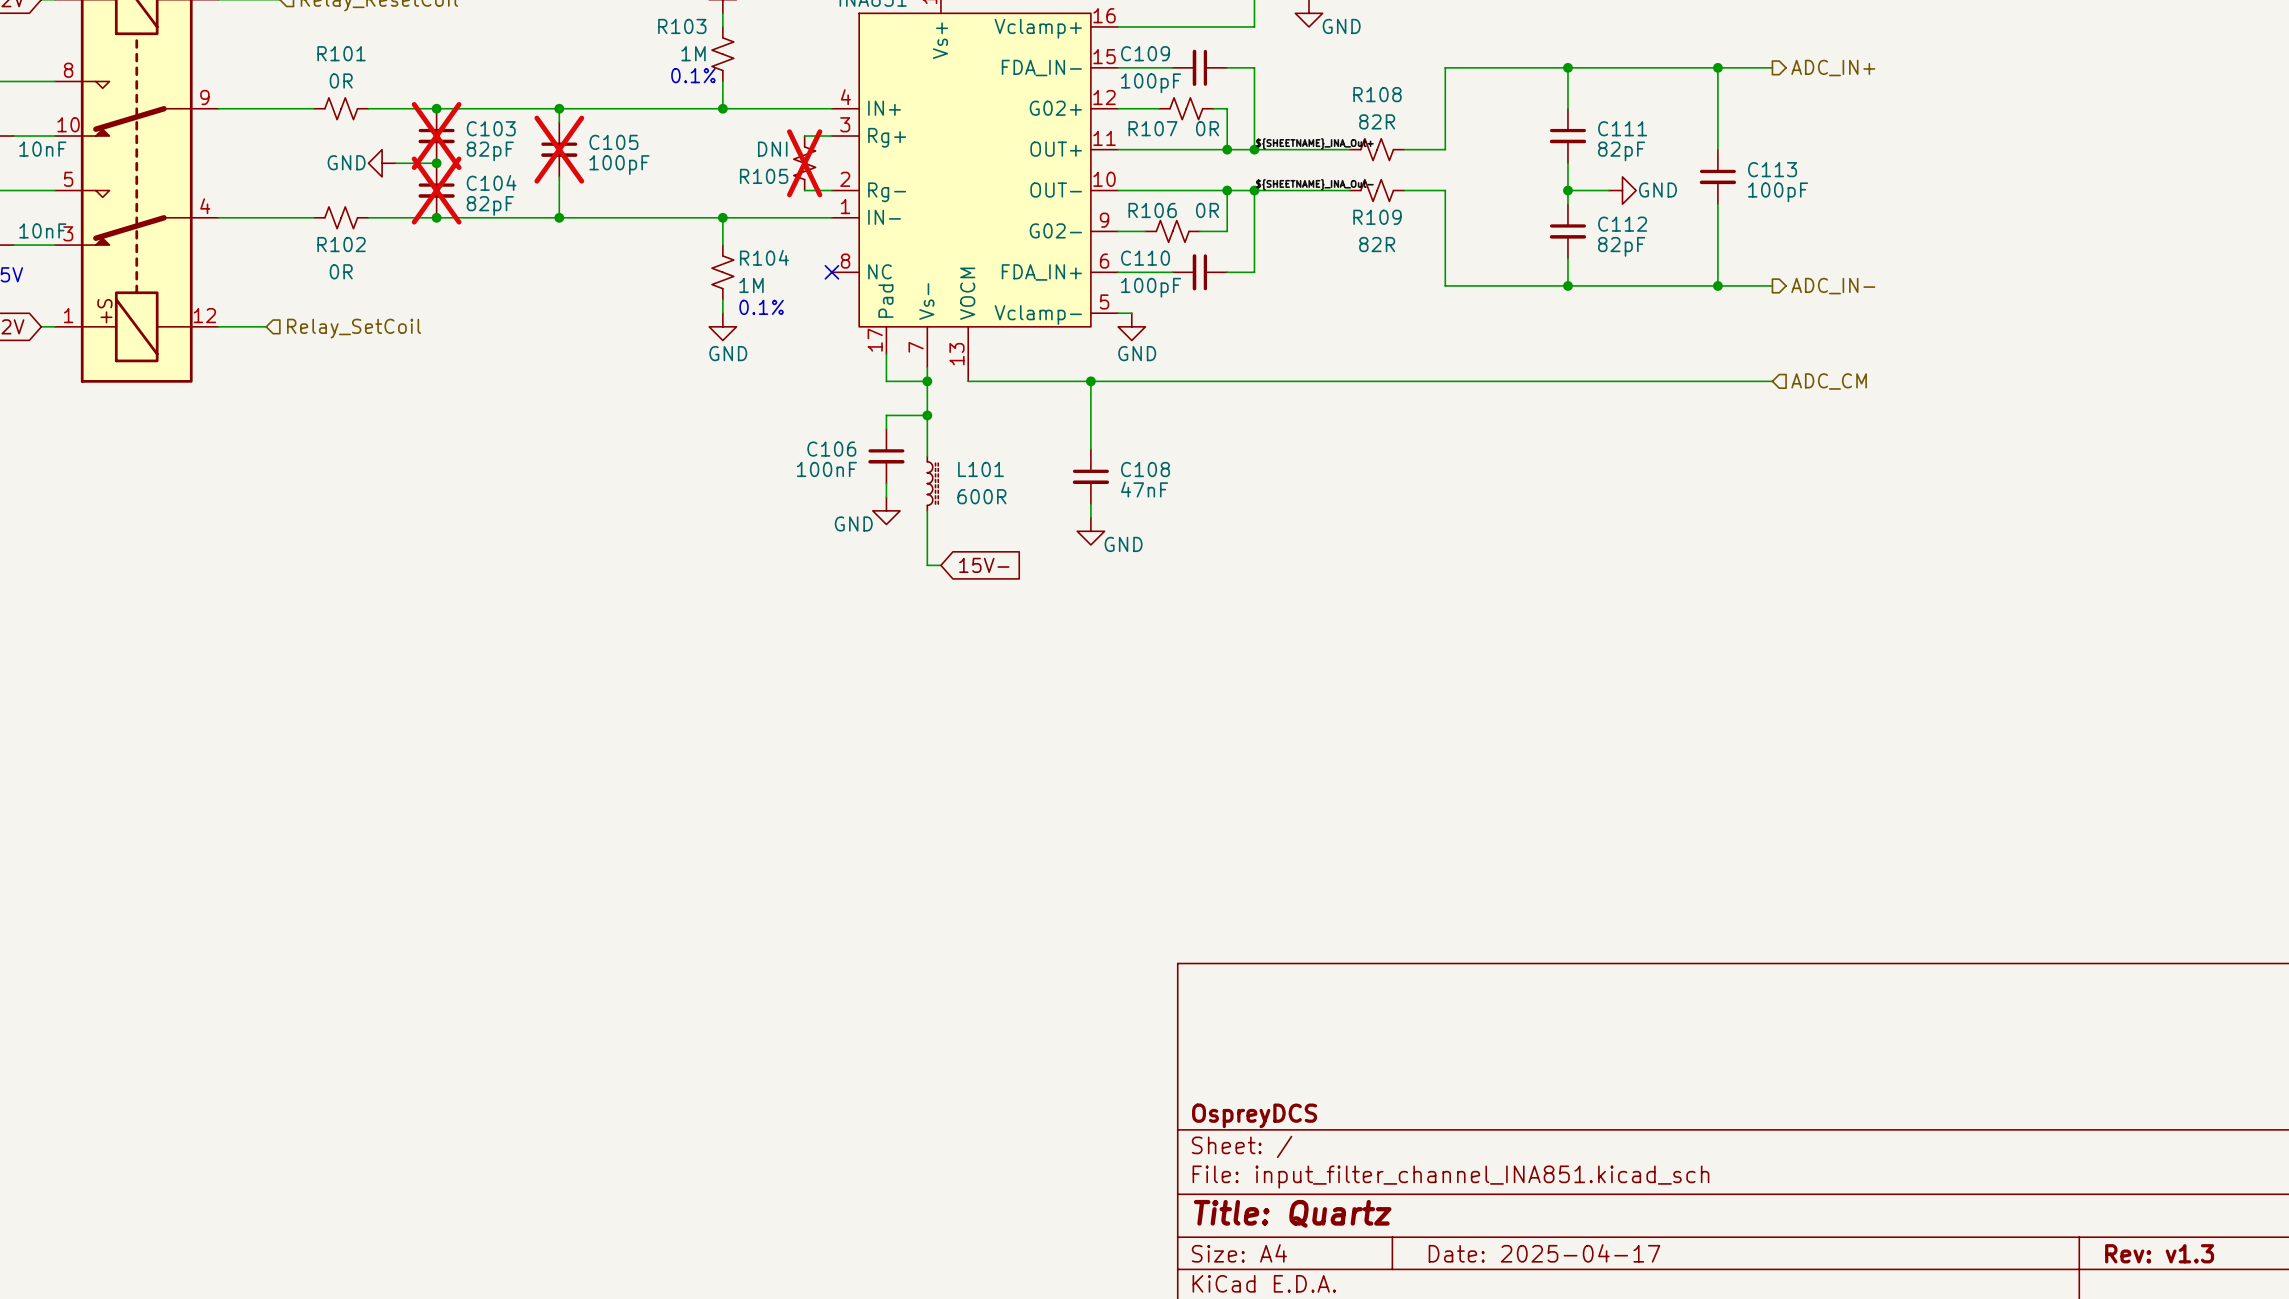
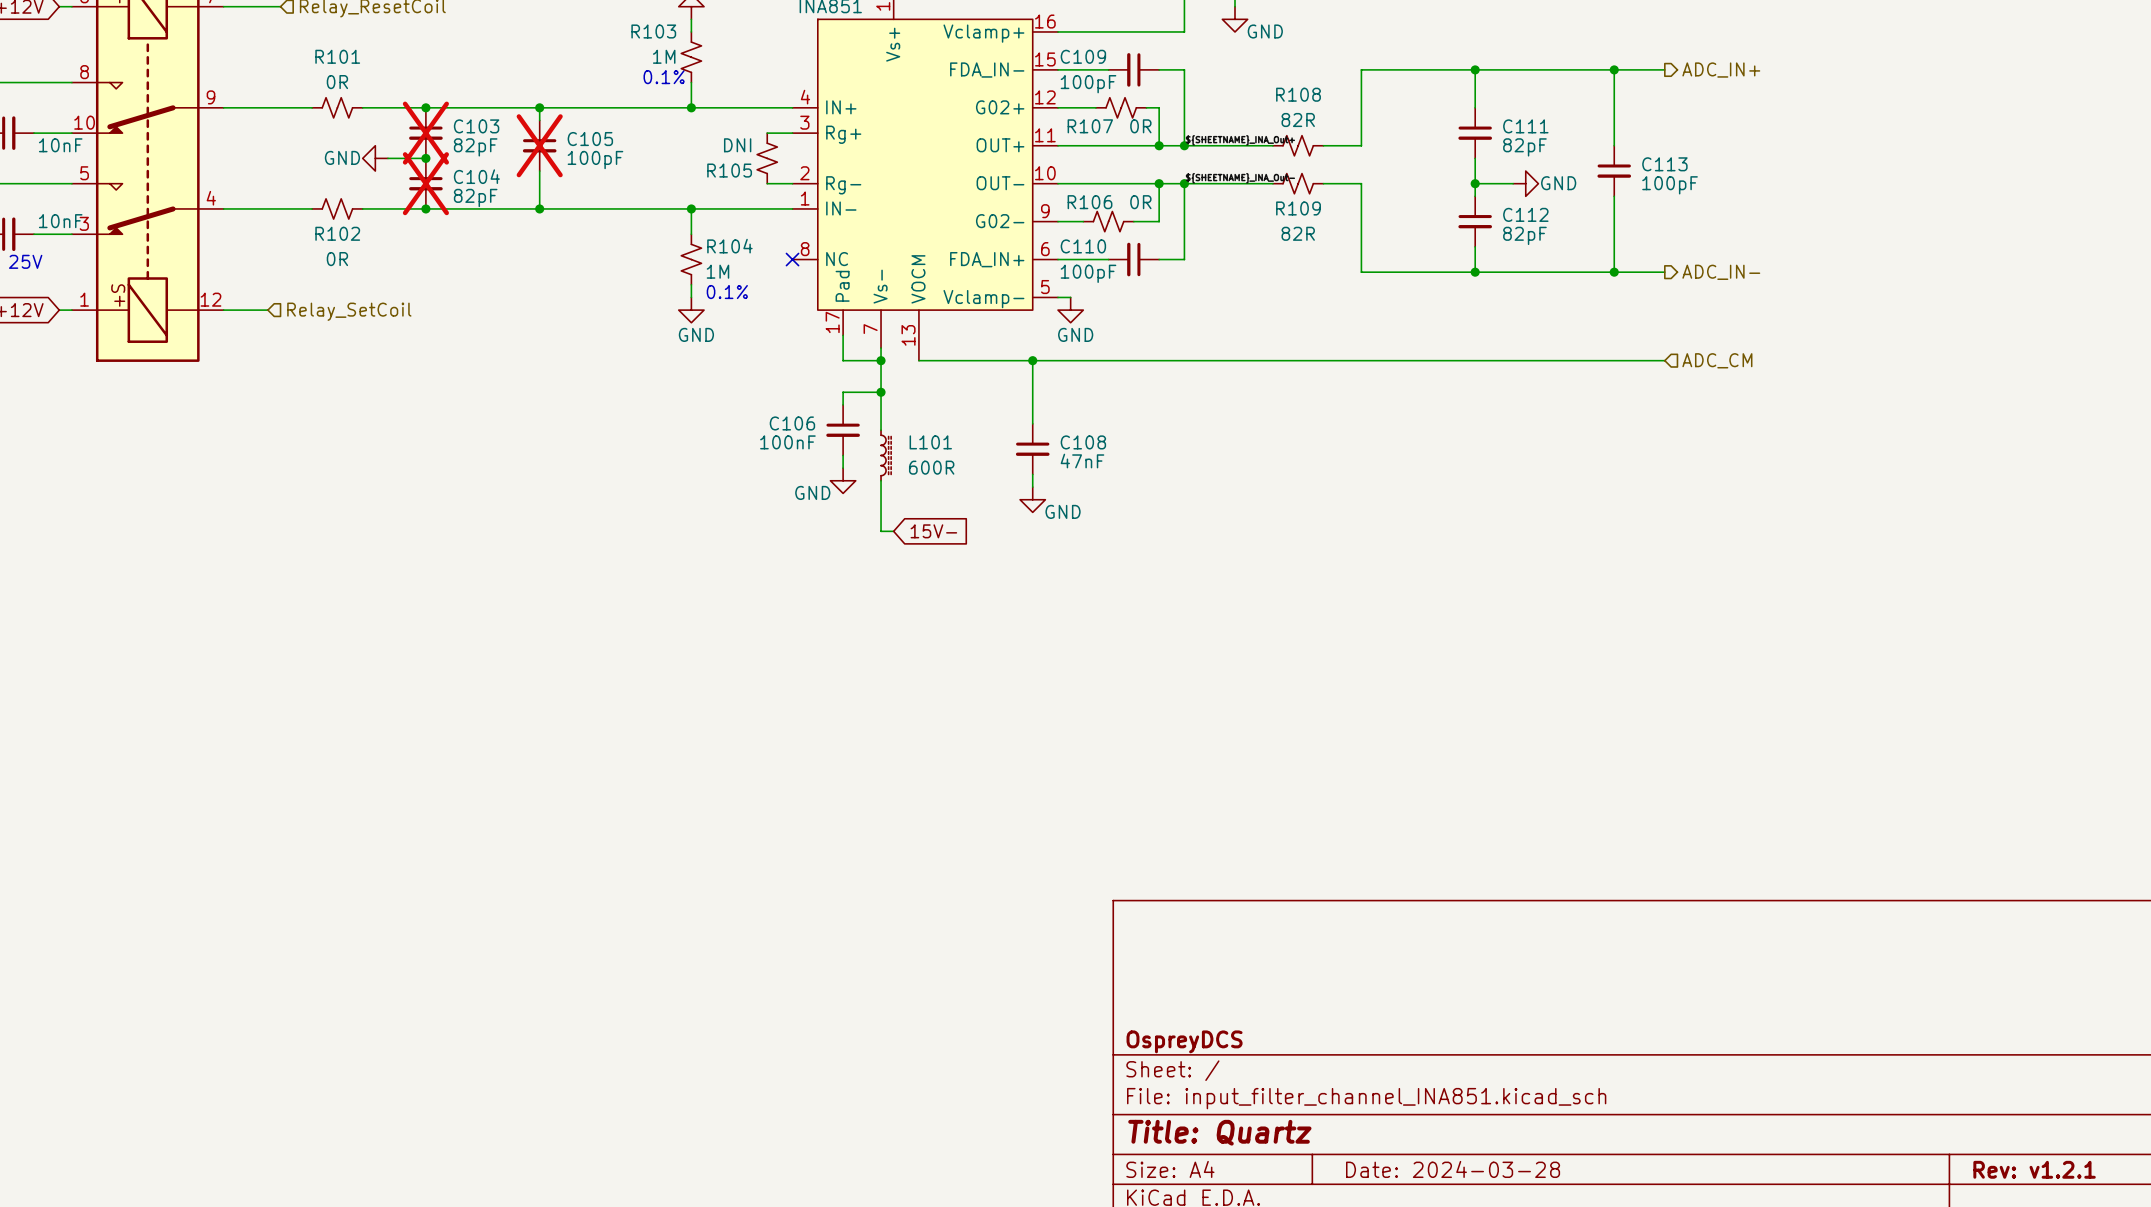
R105 do-not-place cross: (804, 163) -> none
title block: Date: 2025-04-17 (1544, 1253) -> Date: 2024-03-28 (1453, 1169)
title block: Rev: v1.3 (2159, 1253) -> Rev: v1.2.1 (2034, 1169)

